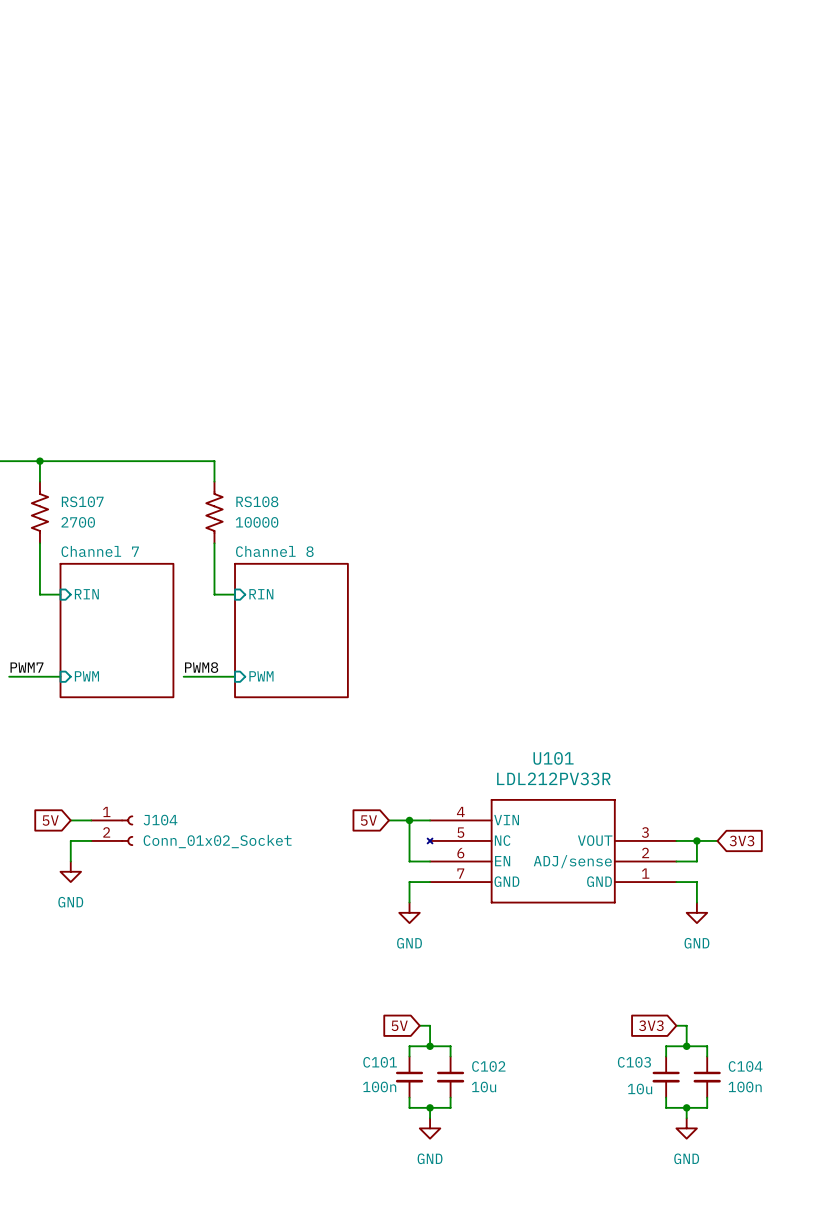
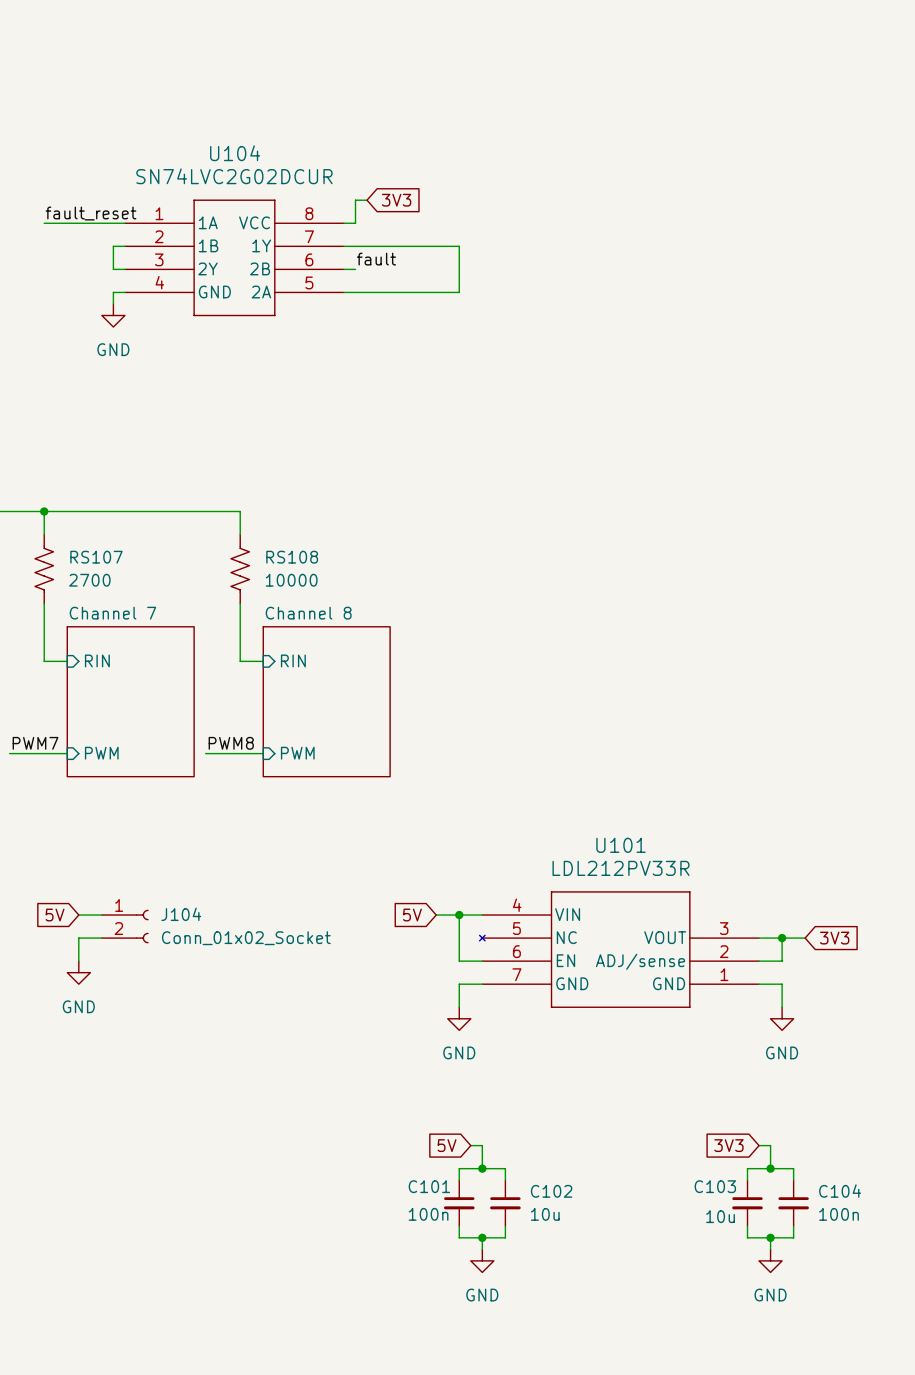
wire: none -> (367, 200) (355, 200) (355, 223) (343, 223)
global label: none -> 3V3 (396, 200)
label: none -> fault_reset (90, 213)
wire: none -> (44, 223) (124, 223)
wire: none -> (124, 246) (113, 246) (113, 269) (124, 269)
wire: none -> (343, 246) (459, 246) (459, 292) (343, 292)
U104: none -> SN74LVC2G02DCUR (234, 257)
label: none -> fault (376, 259)
wire: none -> (343, 269) (355, 269)
wire: none -> (124, 292) (113, 292) (113, 303)
power symbol: none -> GND (113, 315)

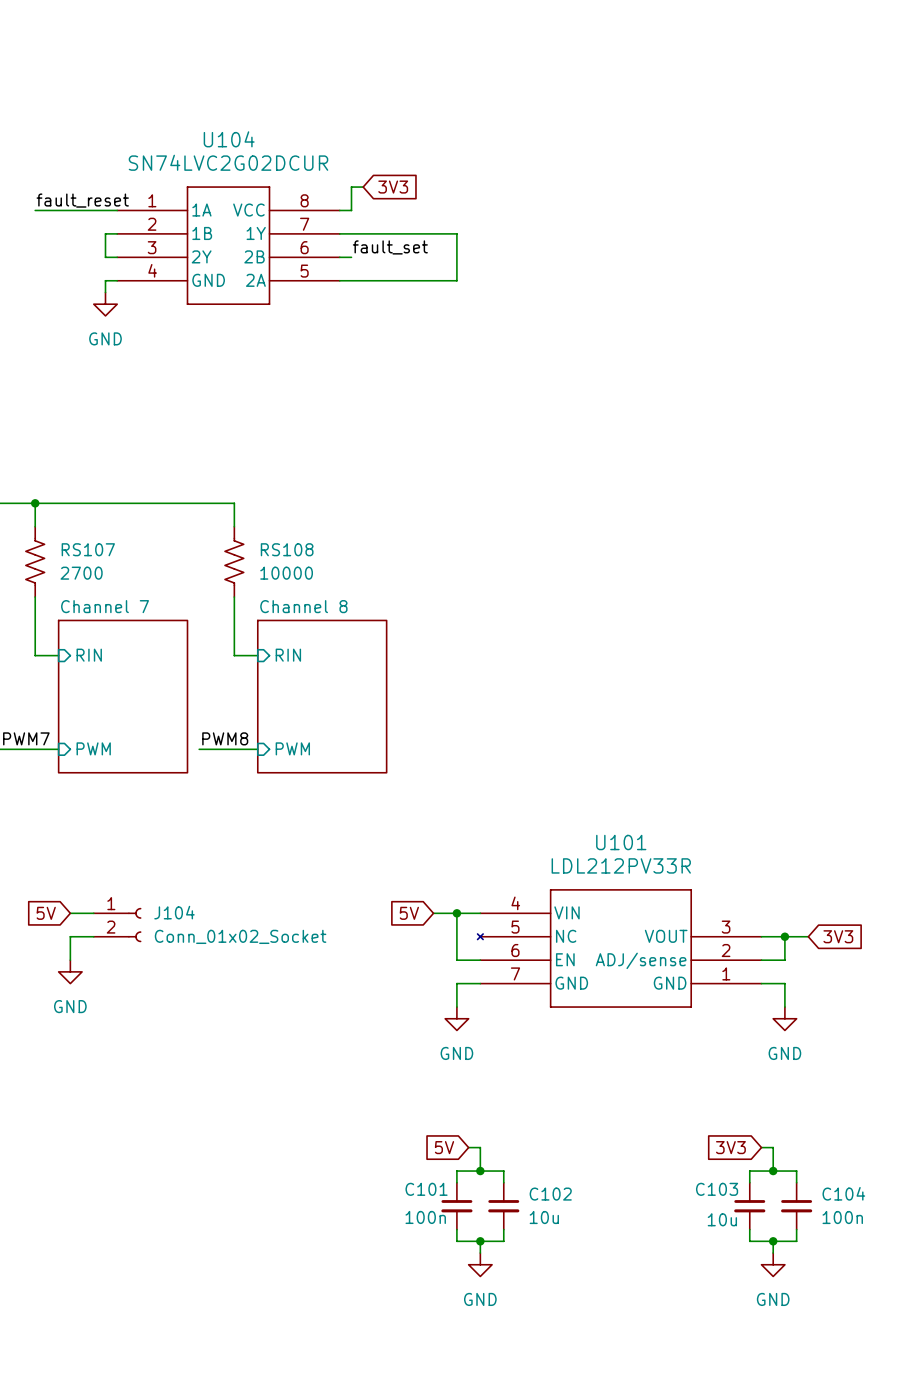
label: fault (376, 259) -> fault_set (390, 247)

